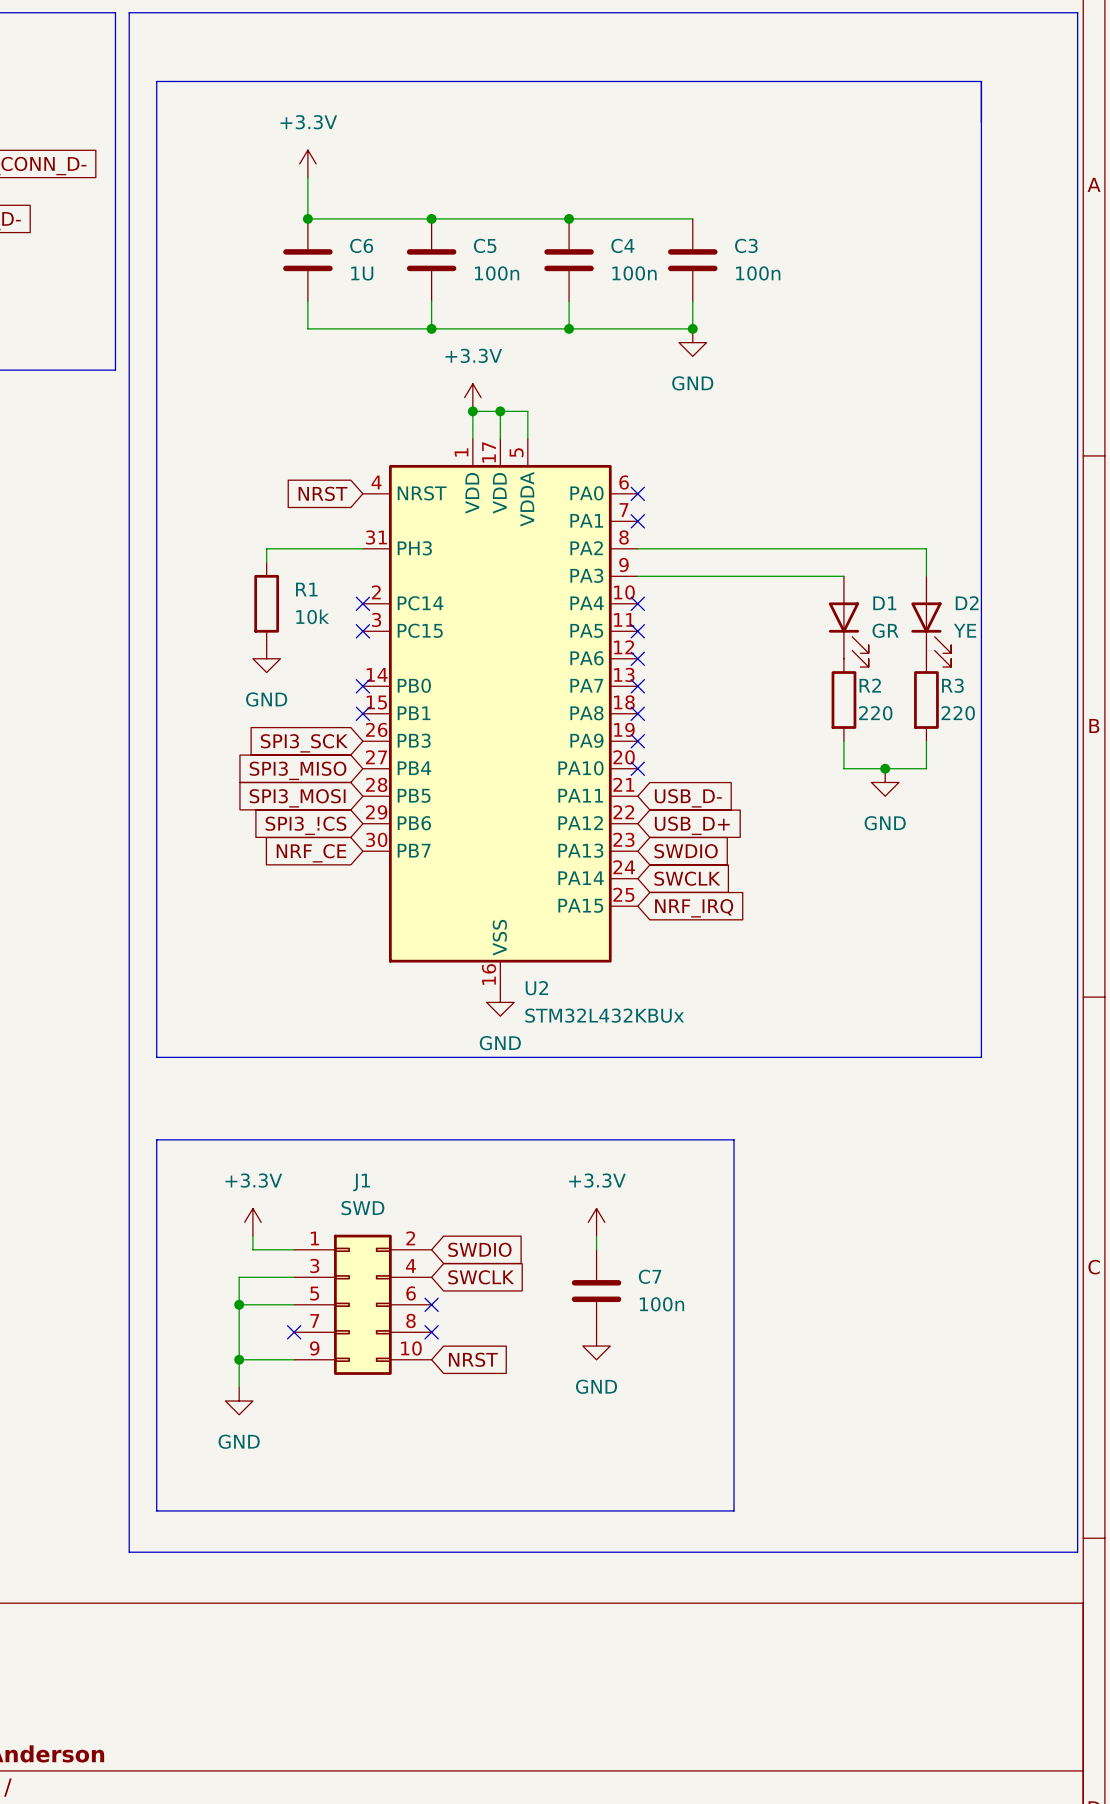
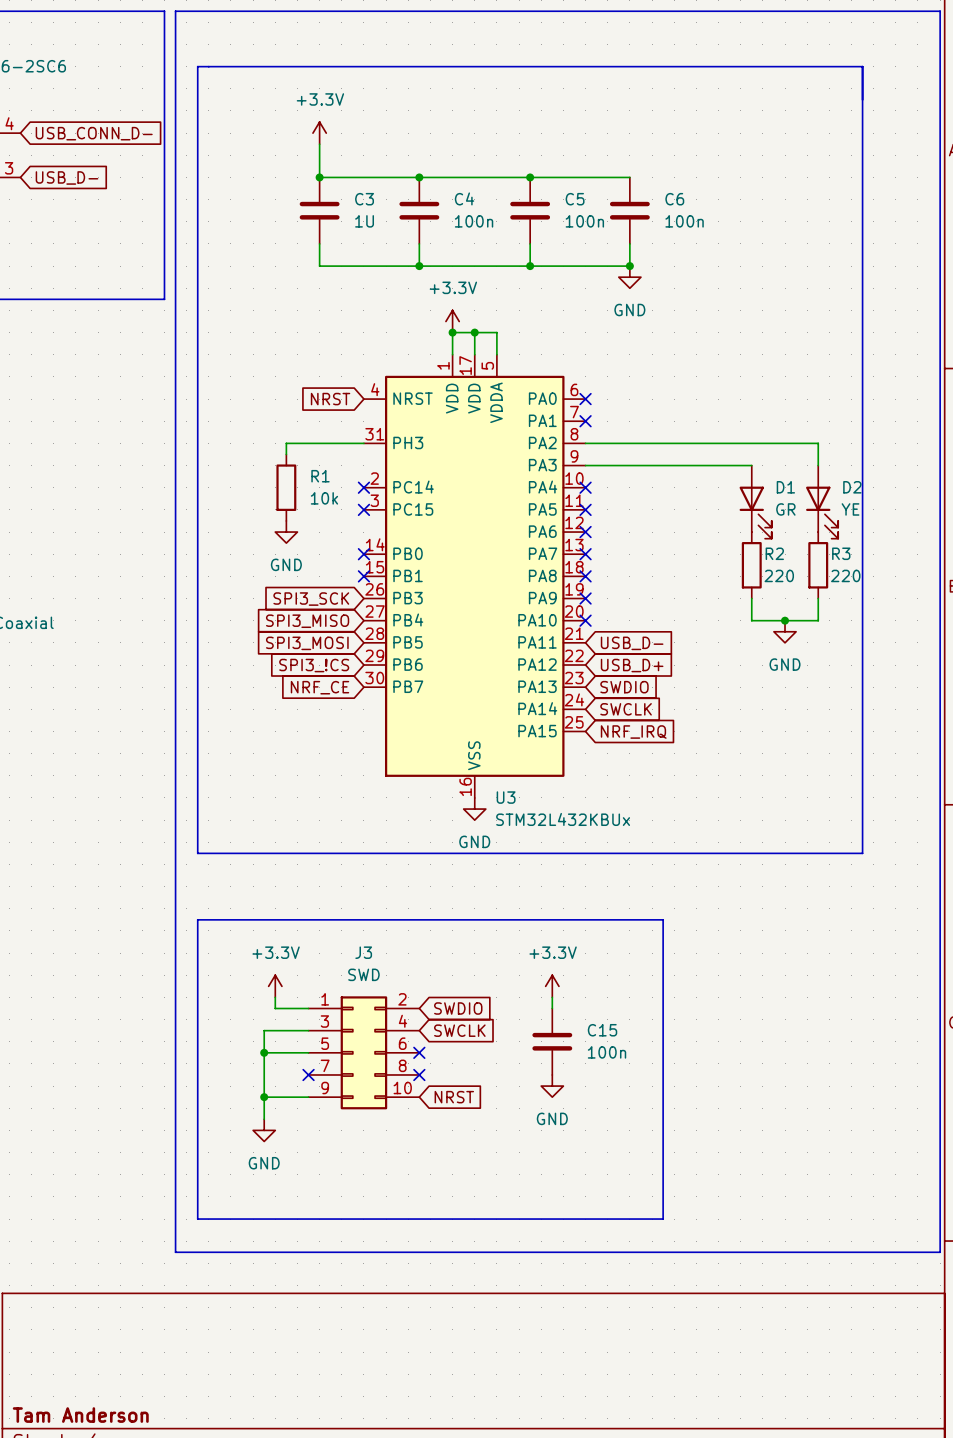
C6 name: C6 (361, 245) -> C3 (364, 199)
C5 name: C5 (485, 245) -> C4 (464, 198)
C4 name: C4 (622, 245) -> C5 (575, 199)
C3 name: C3 (746, 245) -> C6 (674, 199)
U2 name: U2 (536, 988) -> U3 (506, 797)
J1 name: J1 (361, 1182) -> J3 (363, 952)
C7 name: C7 (650, 1276) -> C15 (602, 1030)

